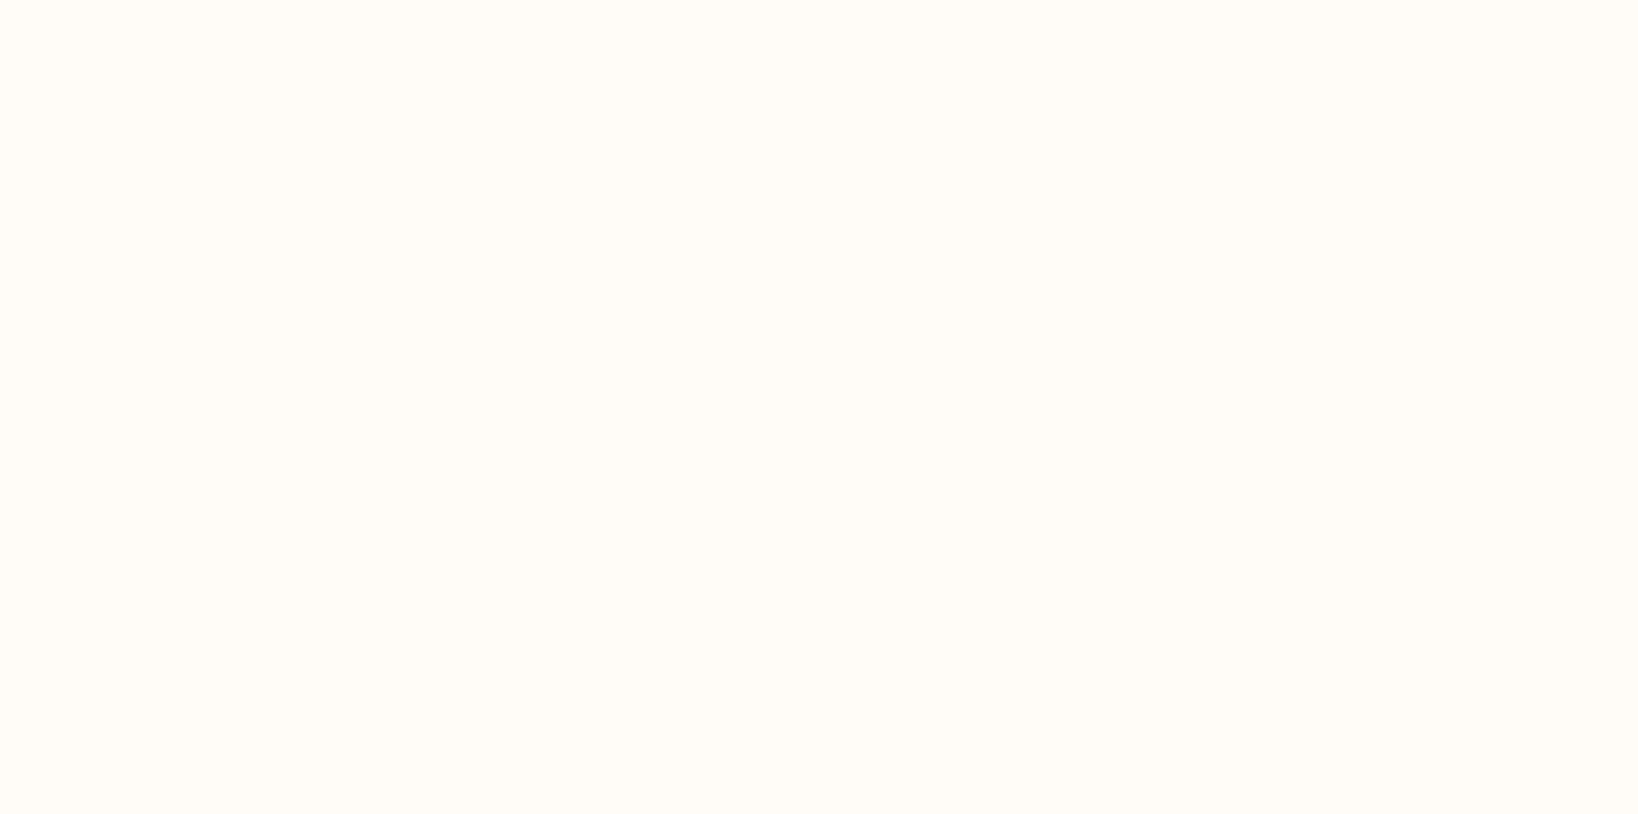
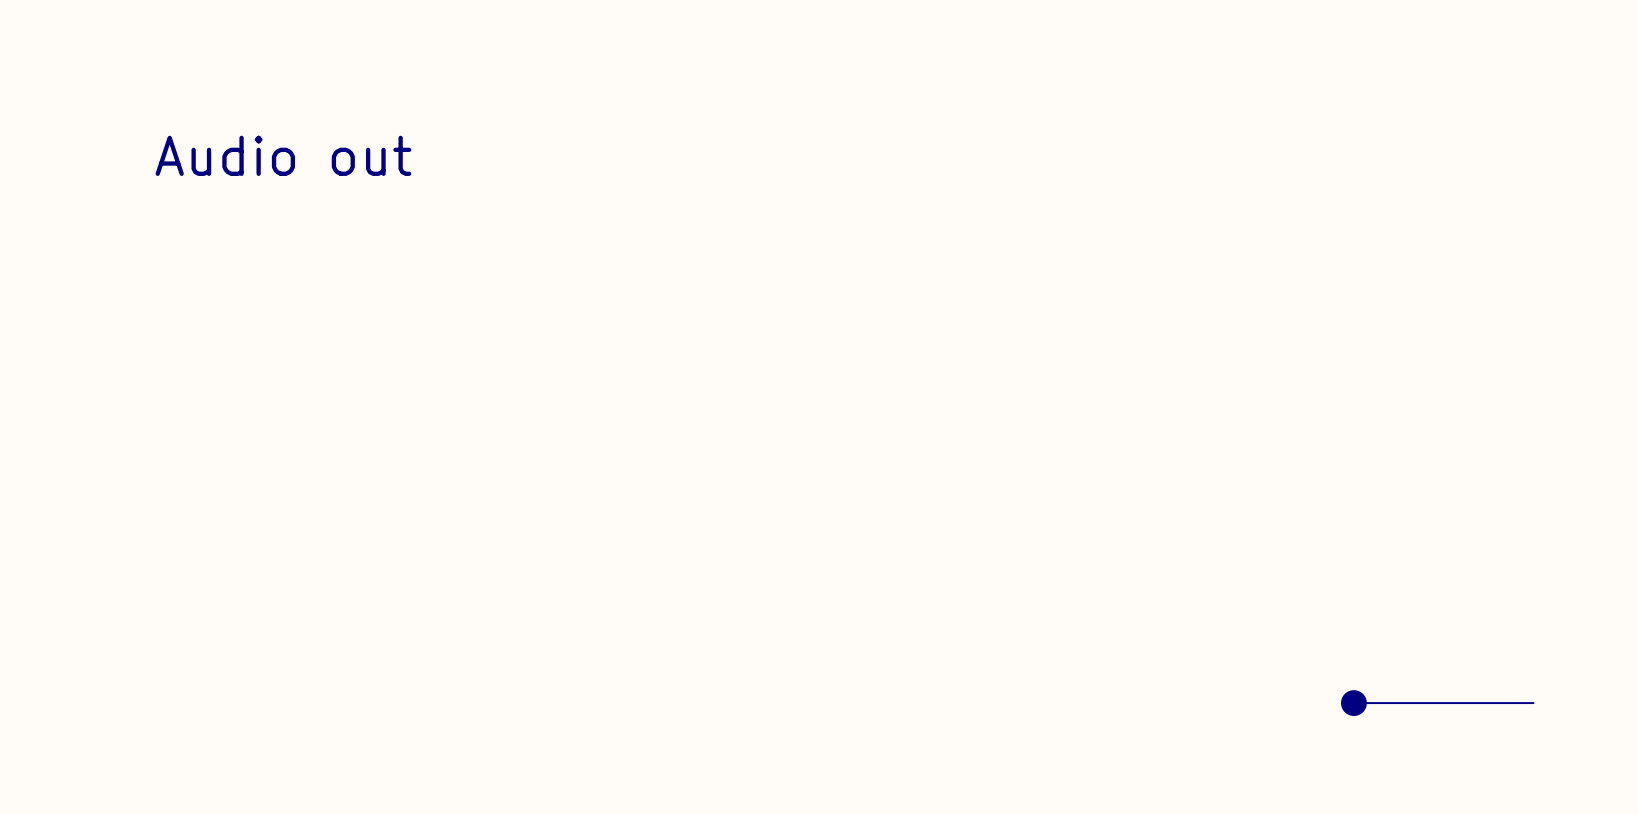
text: none -> Audio out (283, 155)
wire: none -> (1353, 703) (1533, 703)
junction: none -> (1353, 703)

